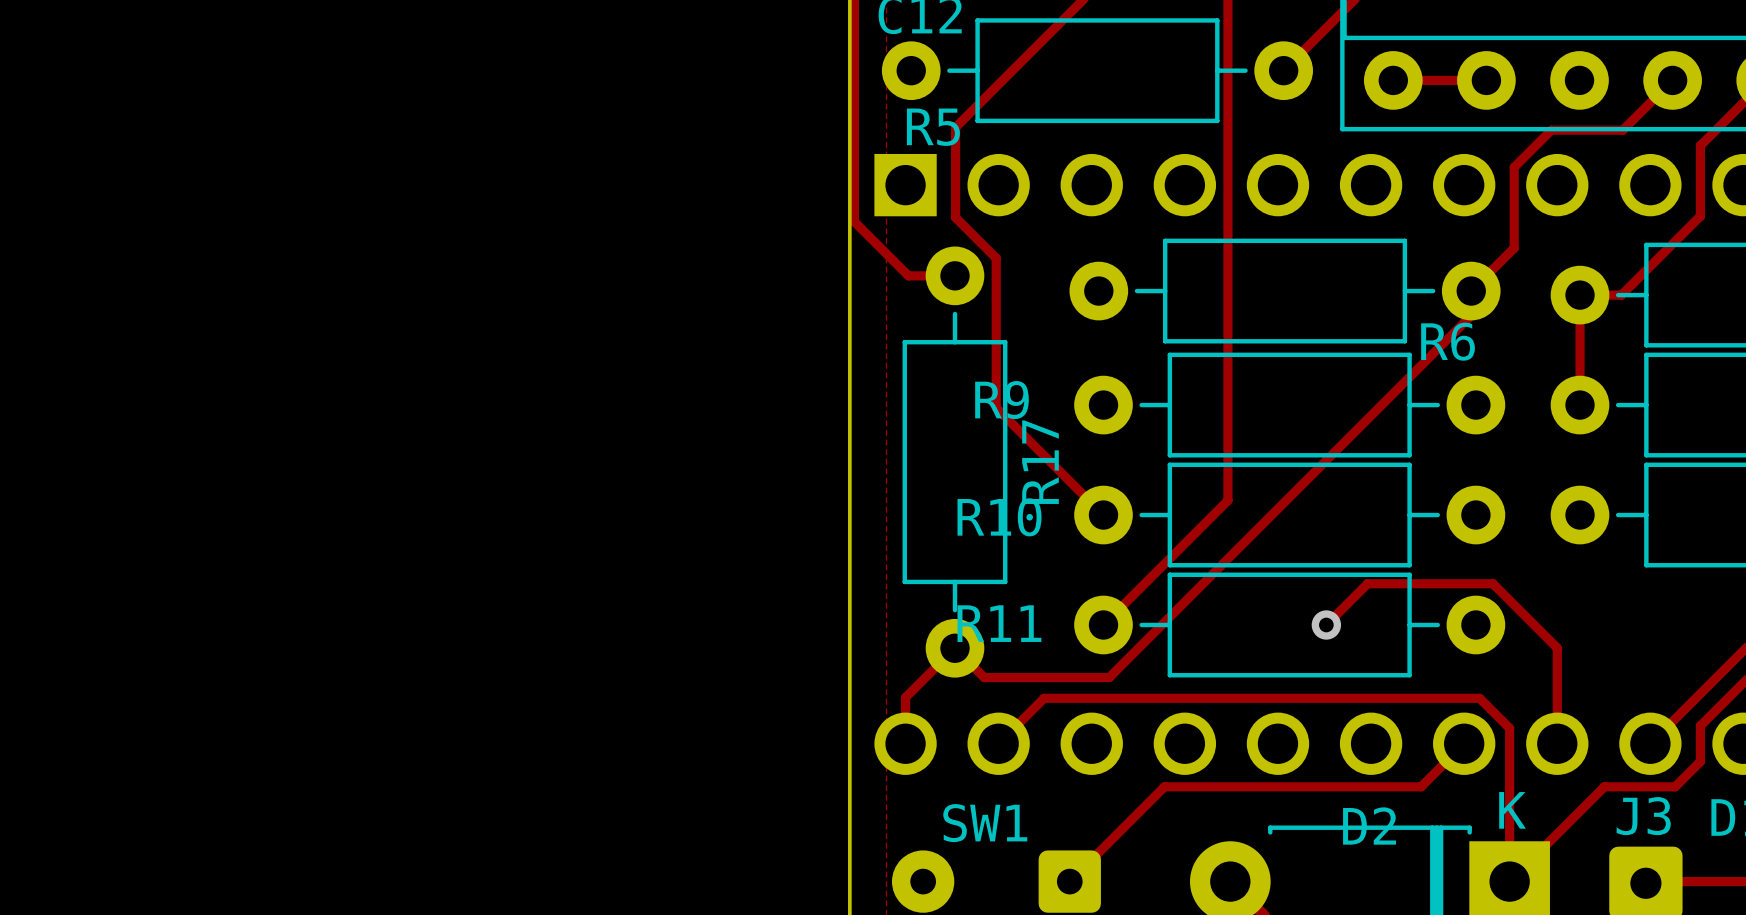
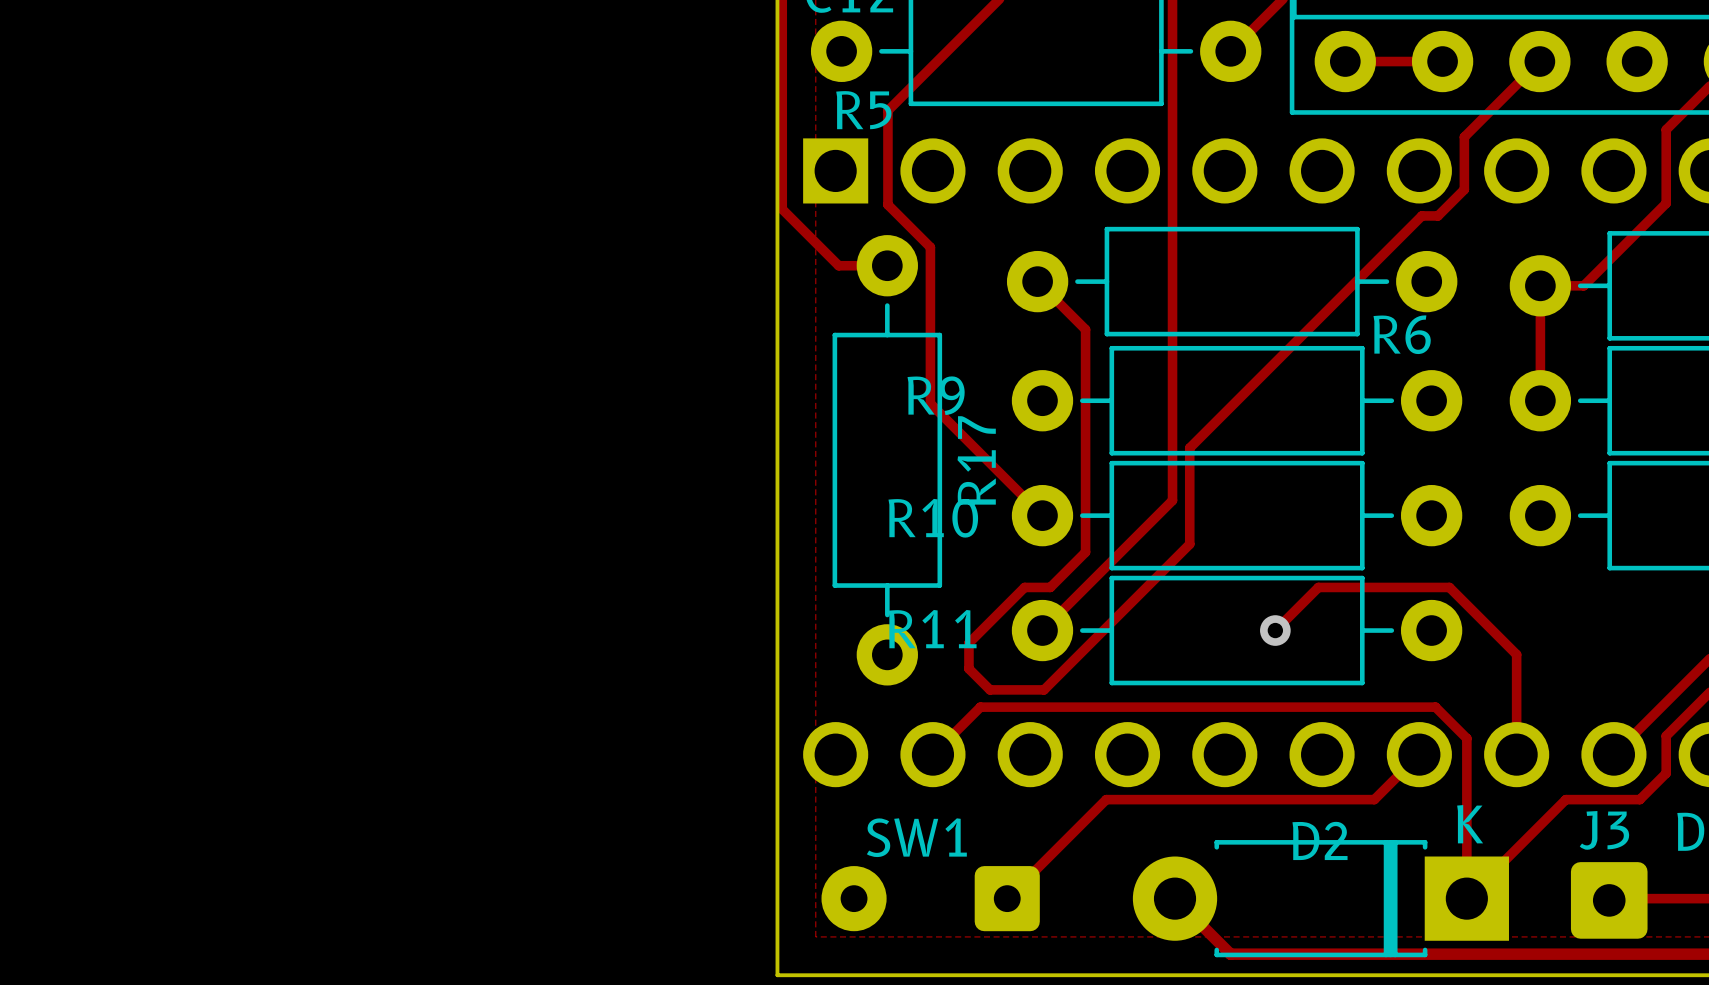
track: (1672, 80) (1622, 130) (1551, 130) (1514, 167) (1514, 248) (1471, 291) (1471, 315) (1244, 542) -> (1539, 61) (1464, 137) (1464, 189) (1438, 215) (1421, 215) (1189, 448) (1189, 544)
track: (955, 648) (984, 677) (1109, 677) -> (1037, 281) (1085, 329) (1085, 552) (1050, 587) (1024, 587) (968, 643) (968, 668) (990, 689) (1044, 689) (1048, 685)
track: (955, 648) (905, 697) (905, 743) -> none

